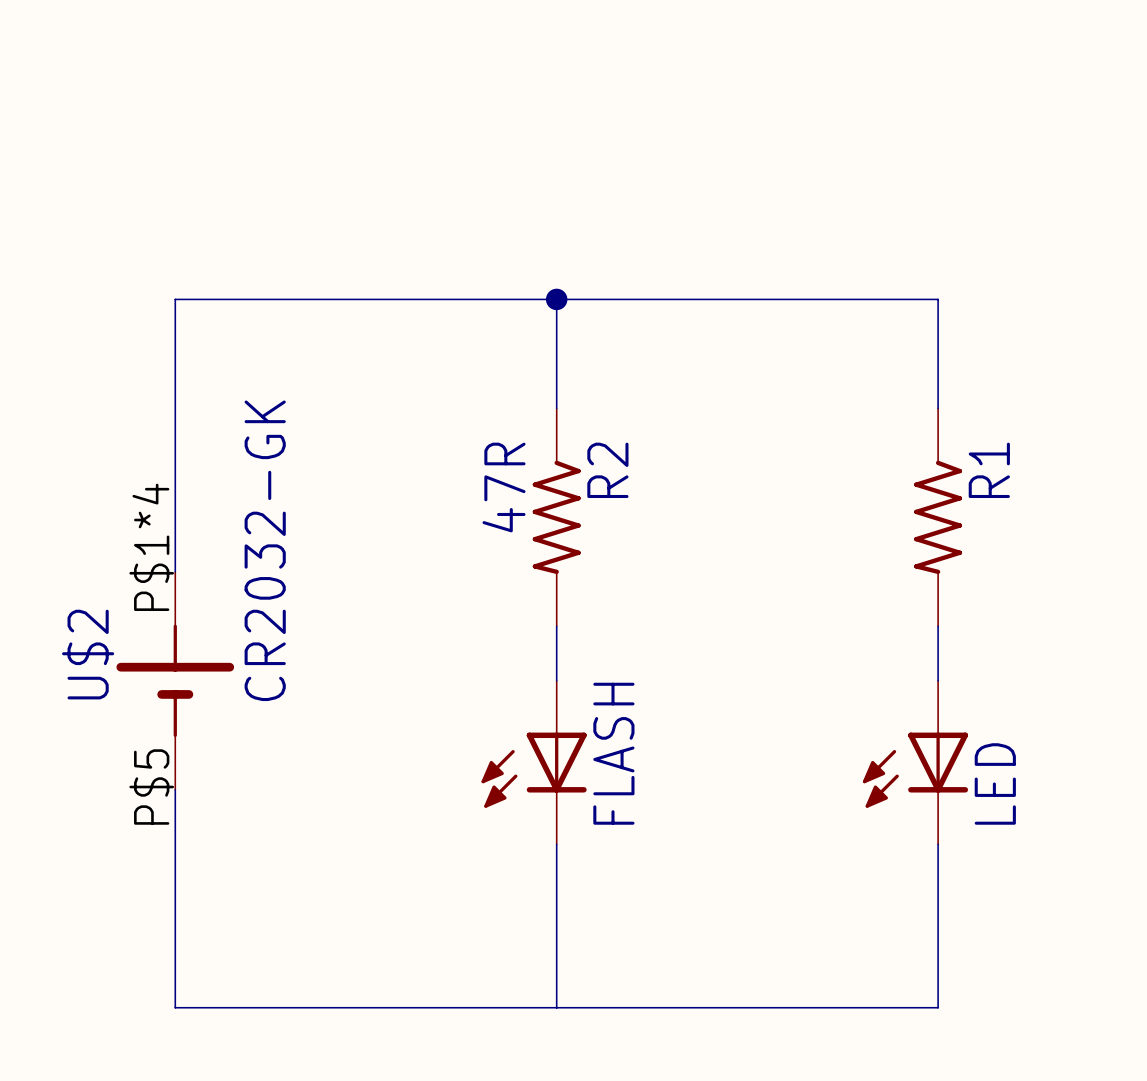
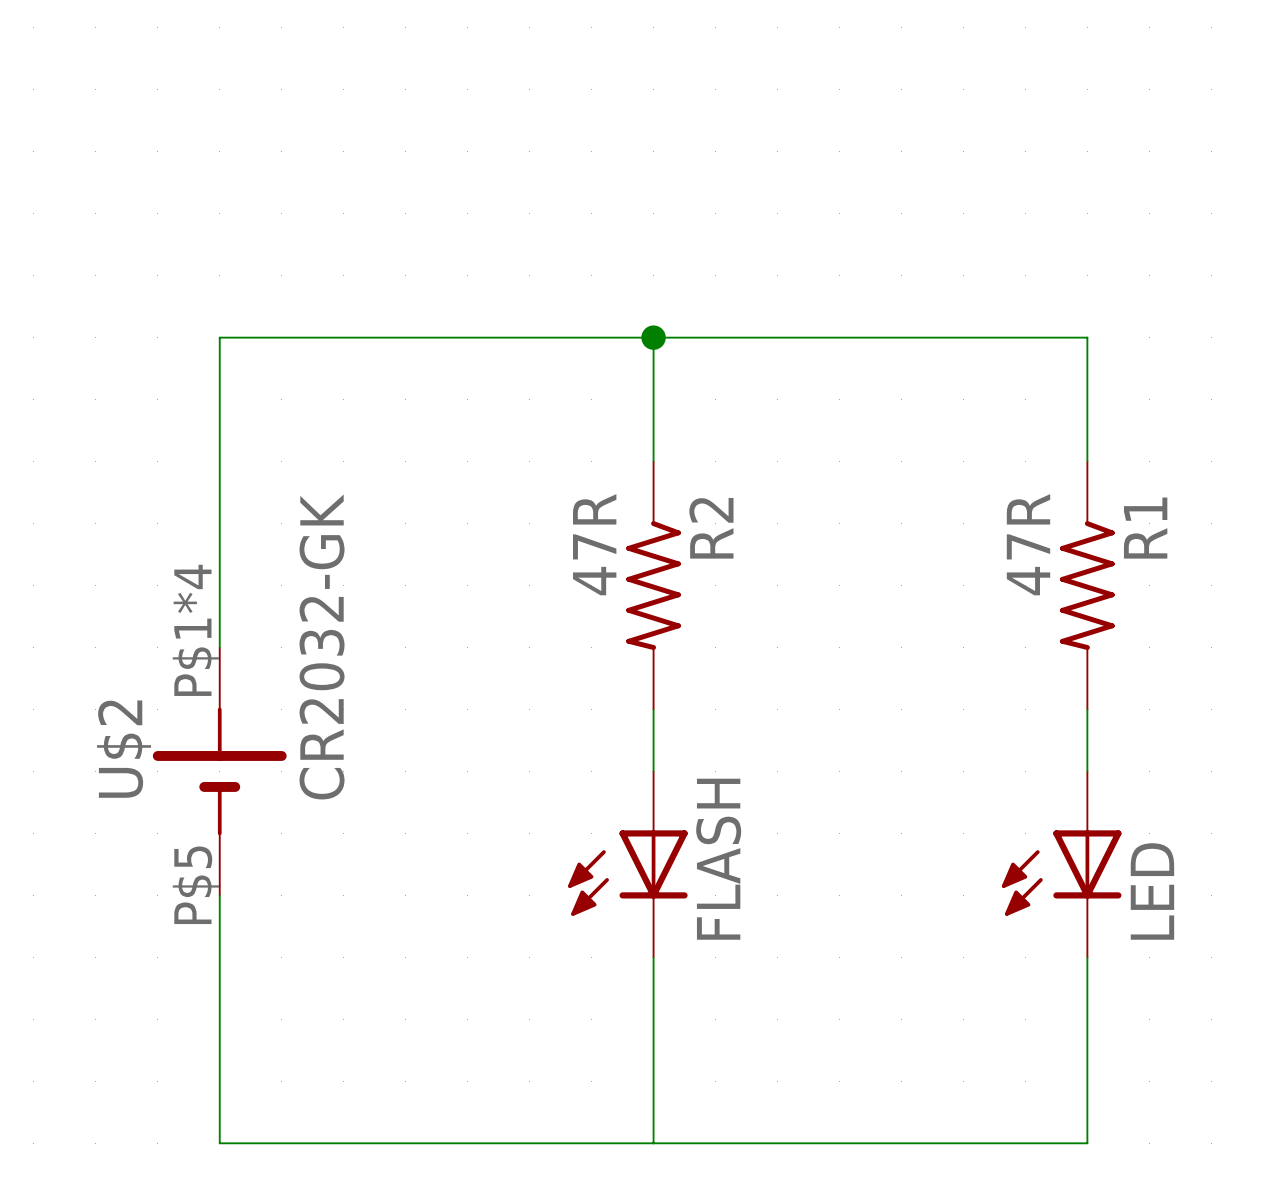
R1 value: none -> 47R (1028, 544)

